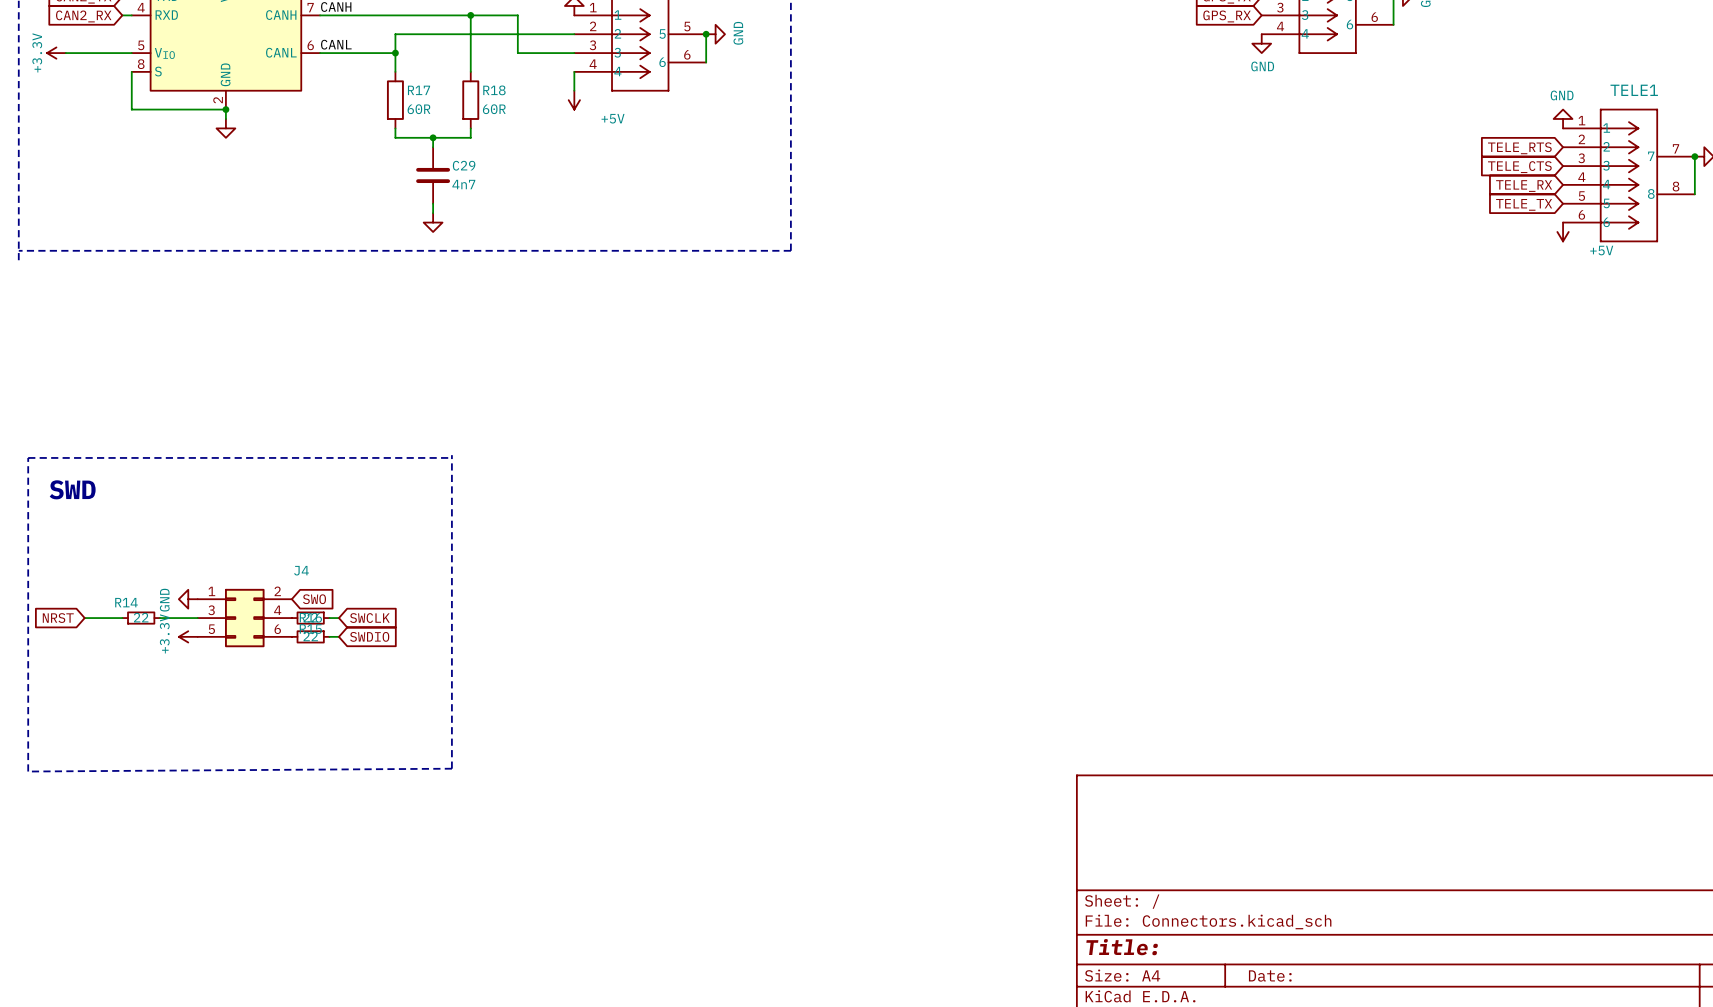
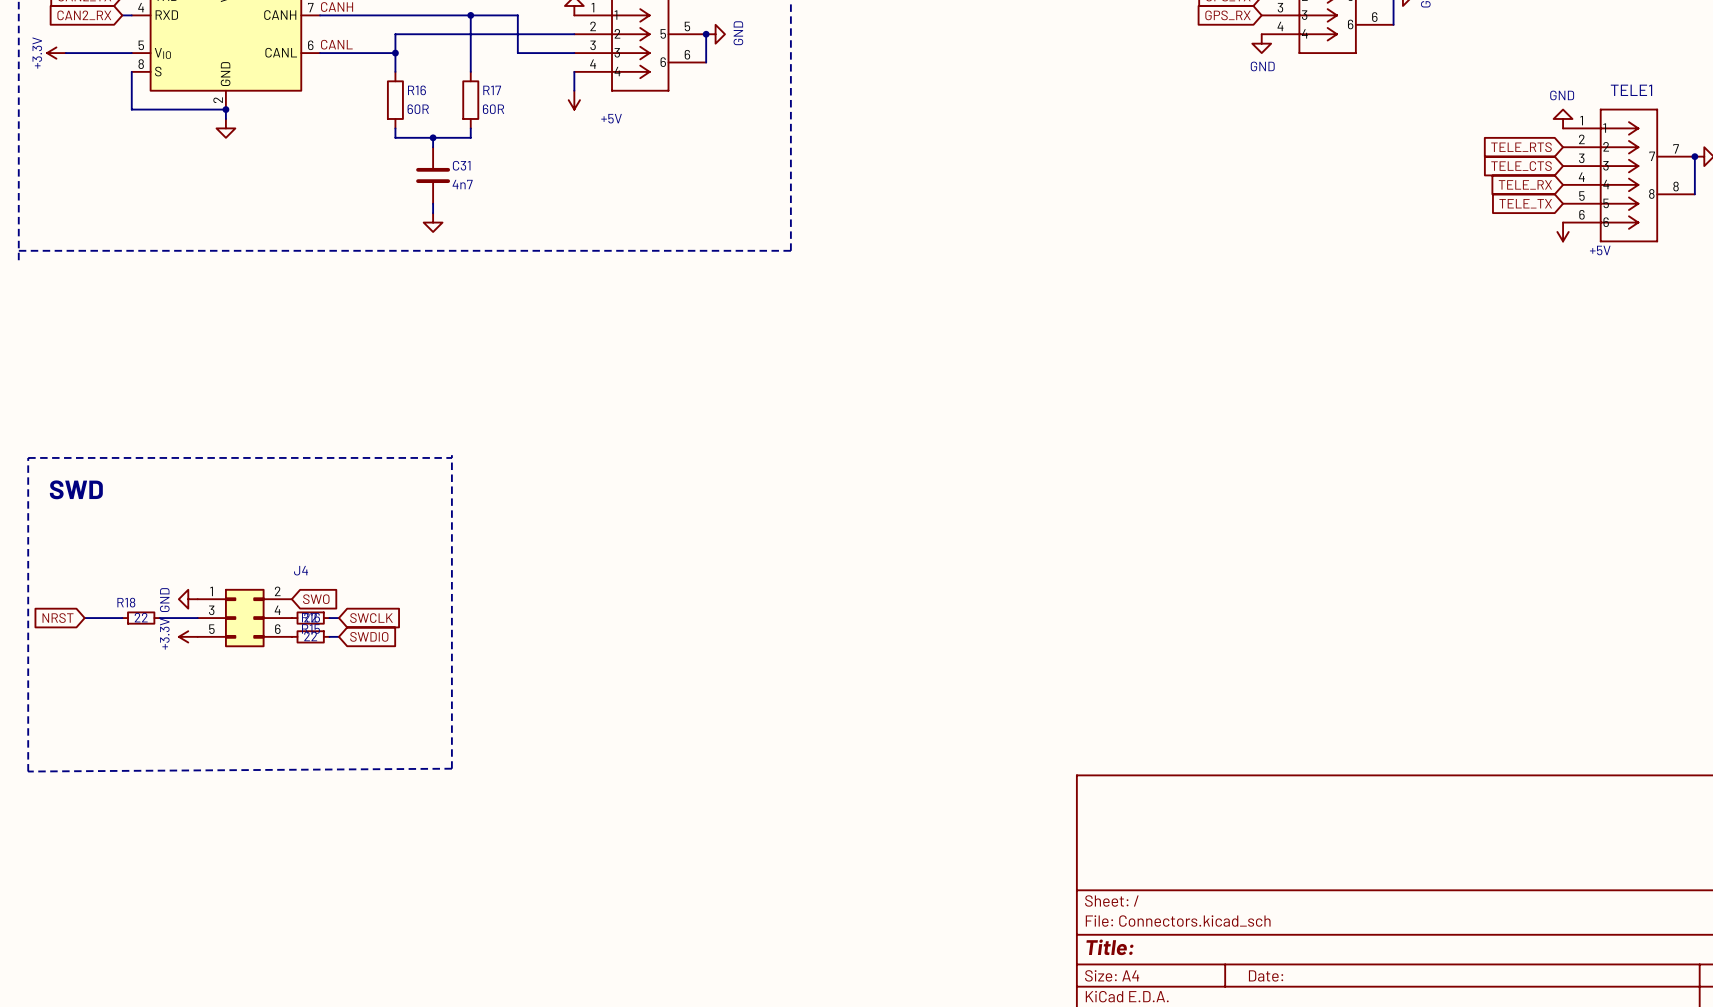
R17 name: R17 (419, 90) -> R16 (416, 90)
R18 name: R18 (494, 90) -> R17 (492, 90)
C29 name: C29 (464, 165) -> C31 (461, 165)
R14 name: R14 (126, 602) -> R18 (126, 602)

